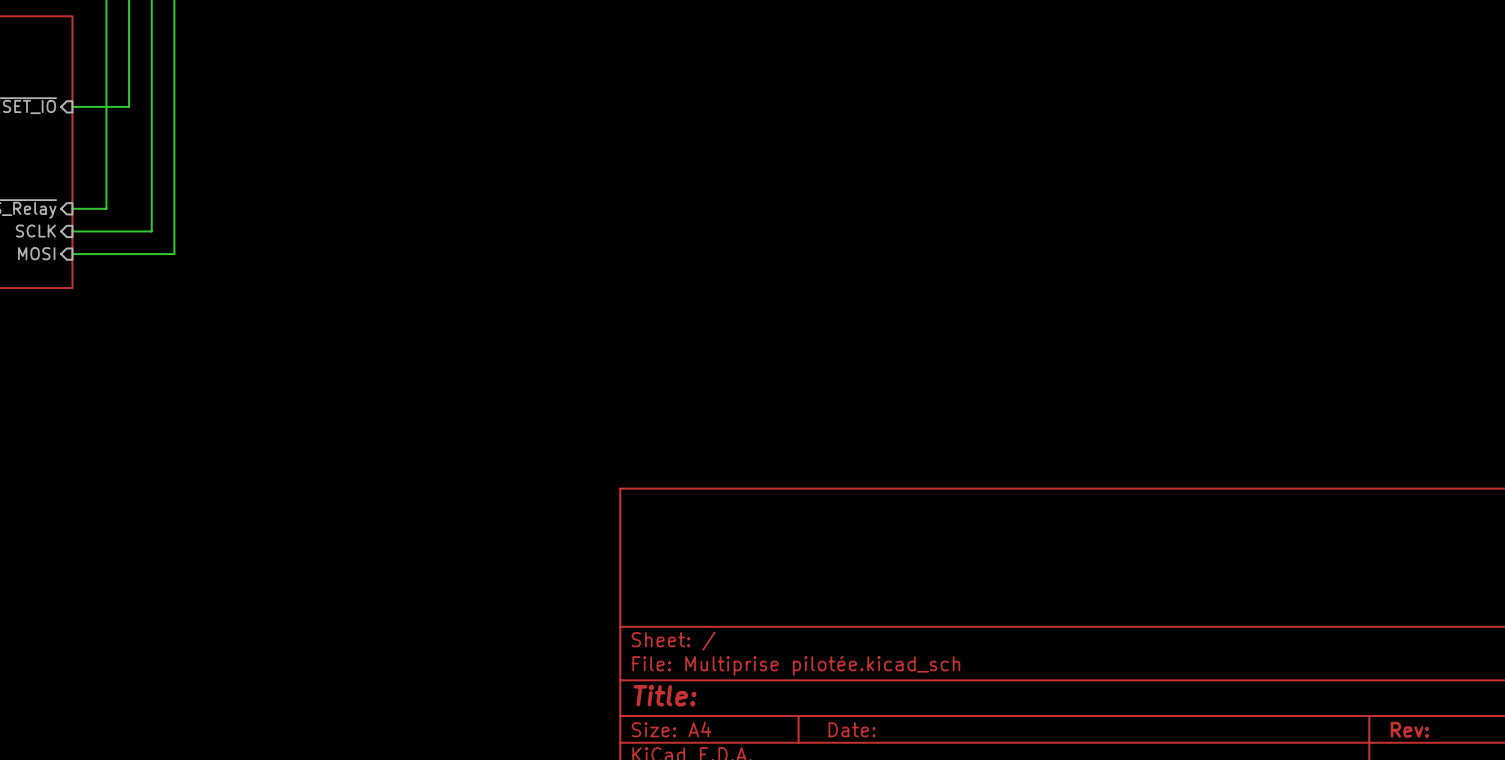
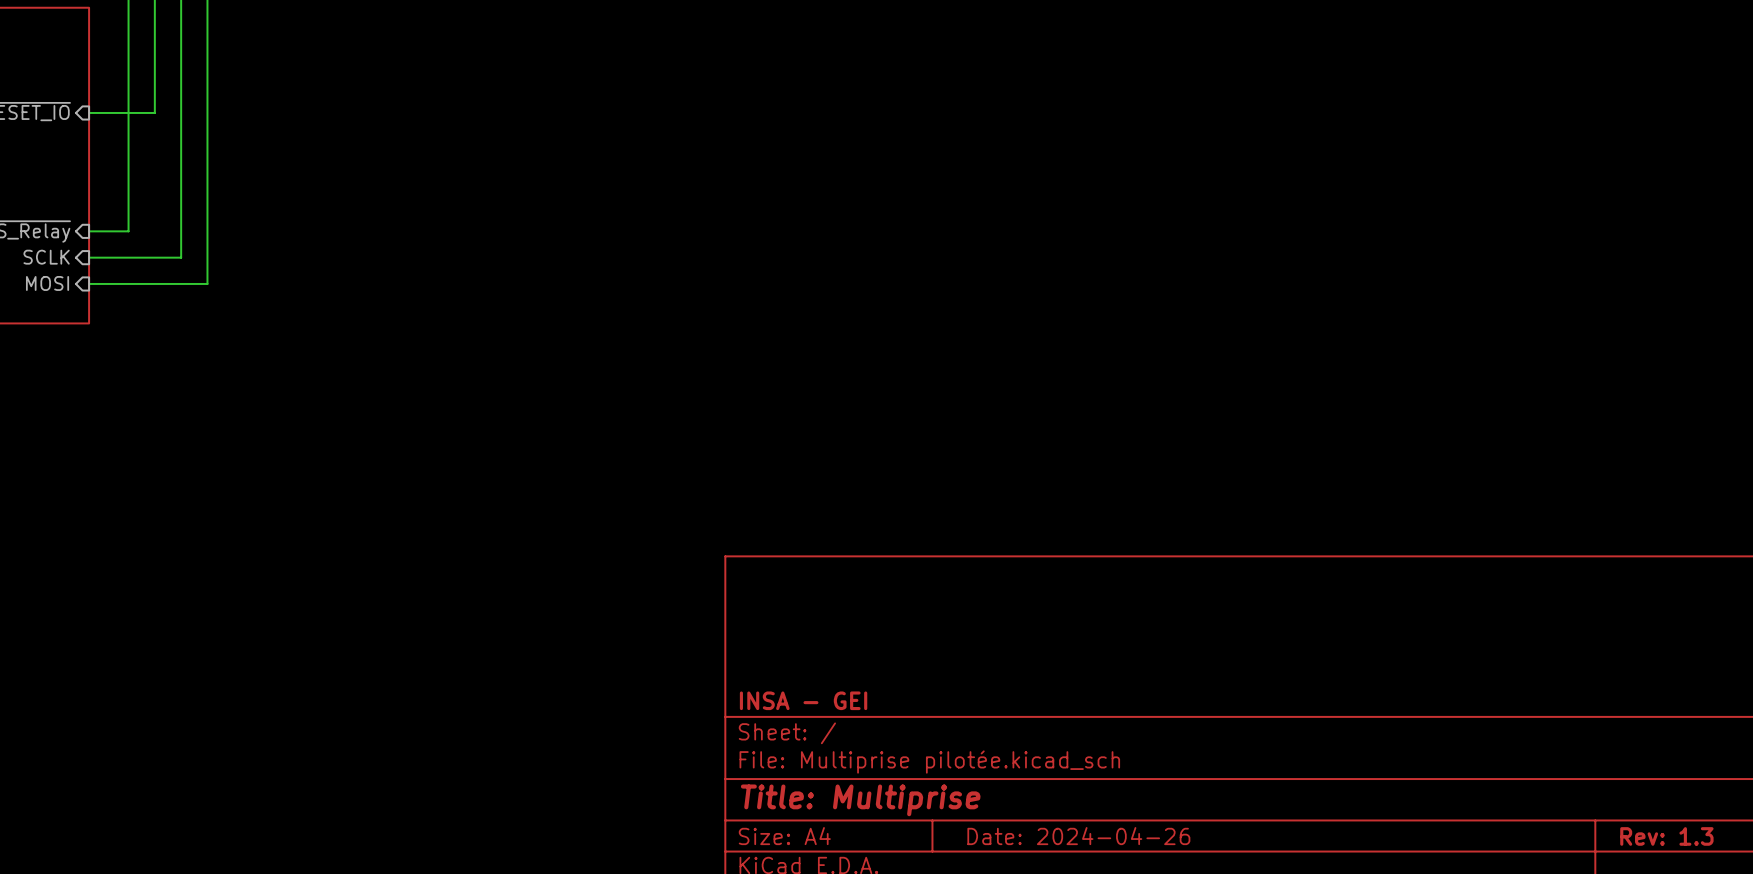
title block: none -> INSA - GEI (803, 700)
title block: Title: (665, 695) -> Title: Multiprise (860, 800)
title block: Date: (852, 729) -> Date: 2024-04-26 (1078, 836)
title block: Rev: (1409, 729) -> Rev: 1.3 (1666, 836)

